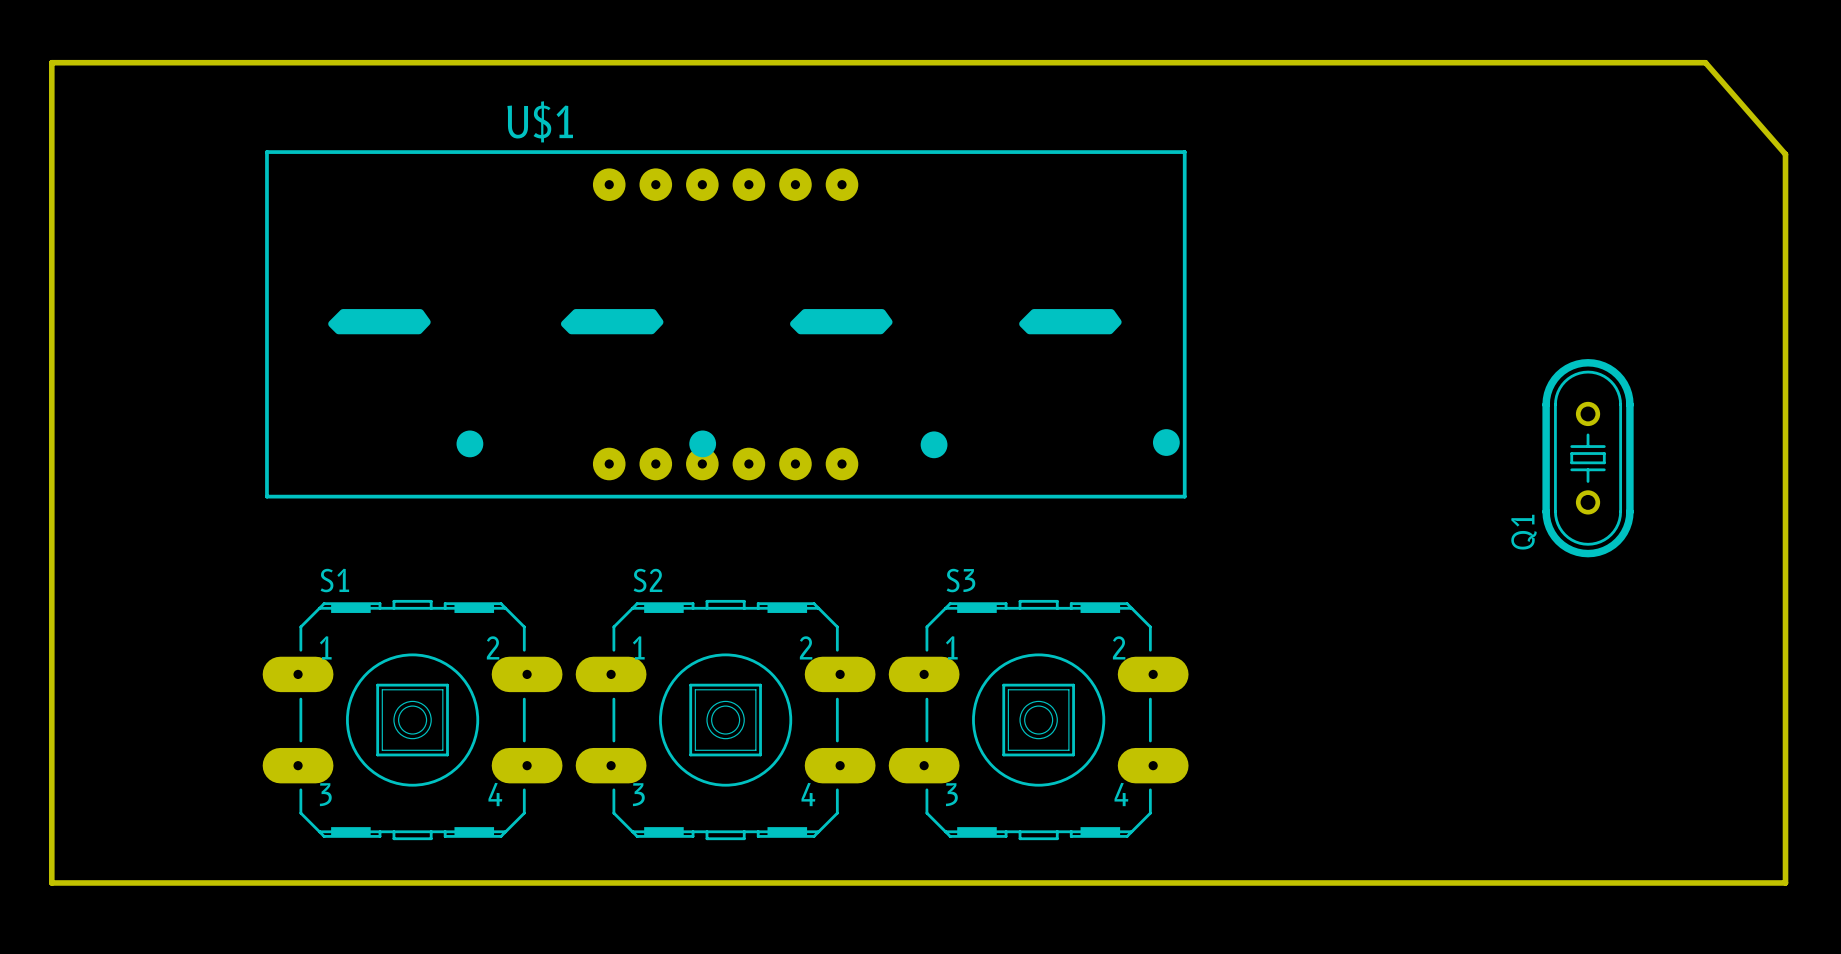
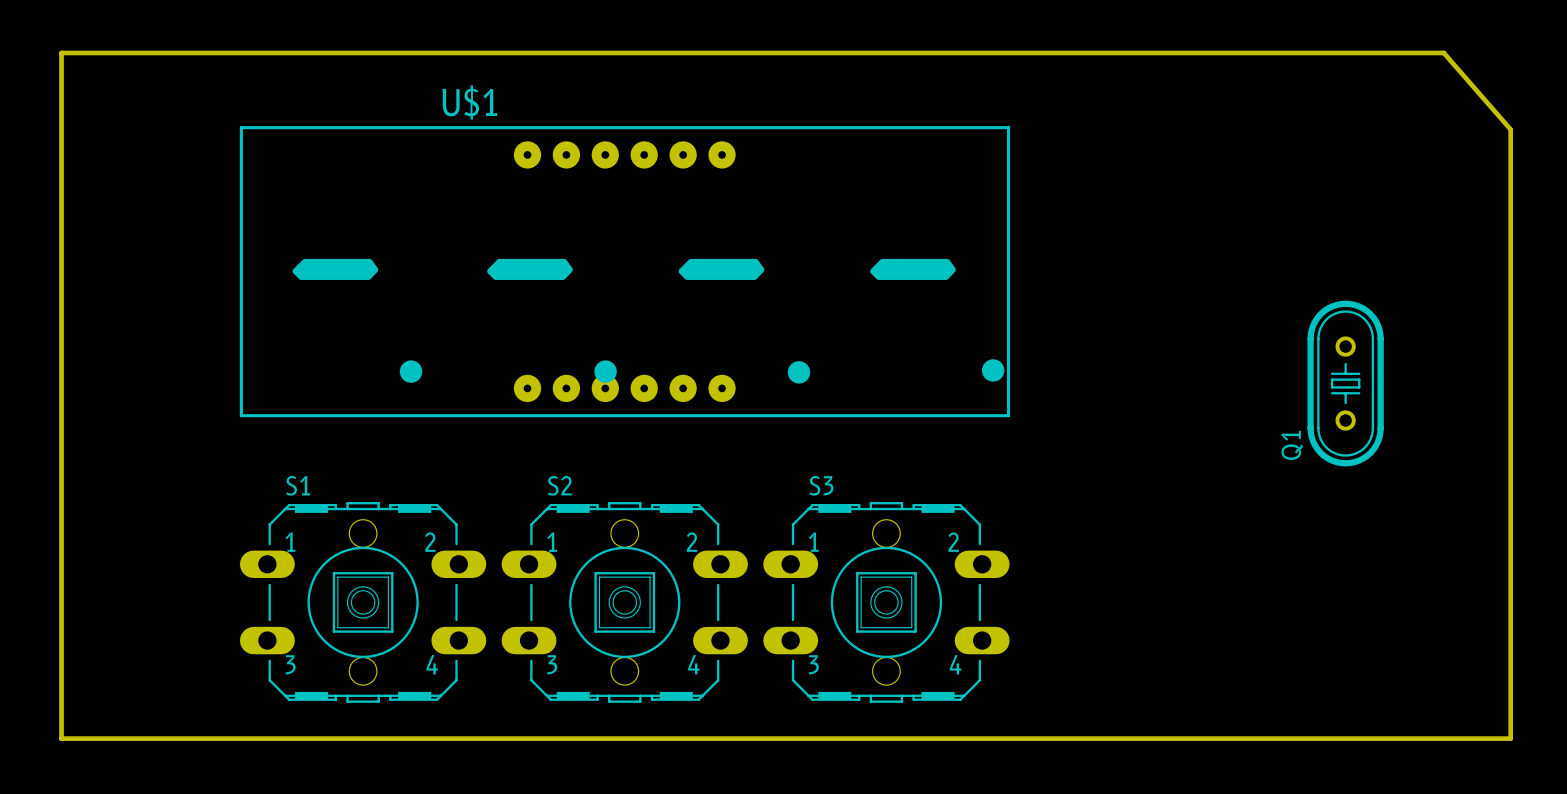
S1 footprint: [262, 599, 563, 841] -> [239, 502, 487, 703]
S2 footprint: [575, 599, 876, 841] -> [501, 502, 748, 703]
S3 footprint: [888, 599, 1189, 841] -> [763, 502, 1010, 703]

